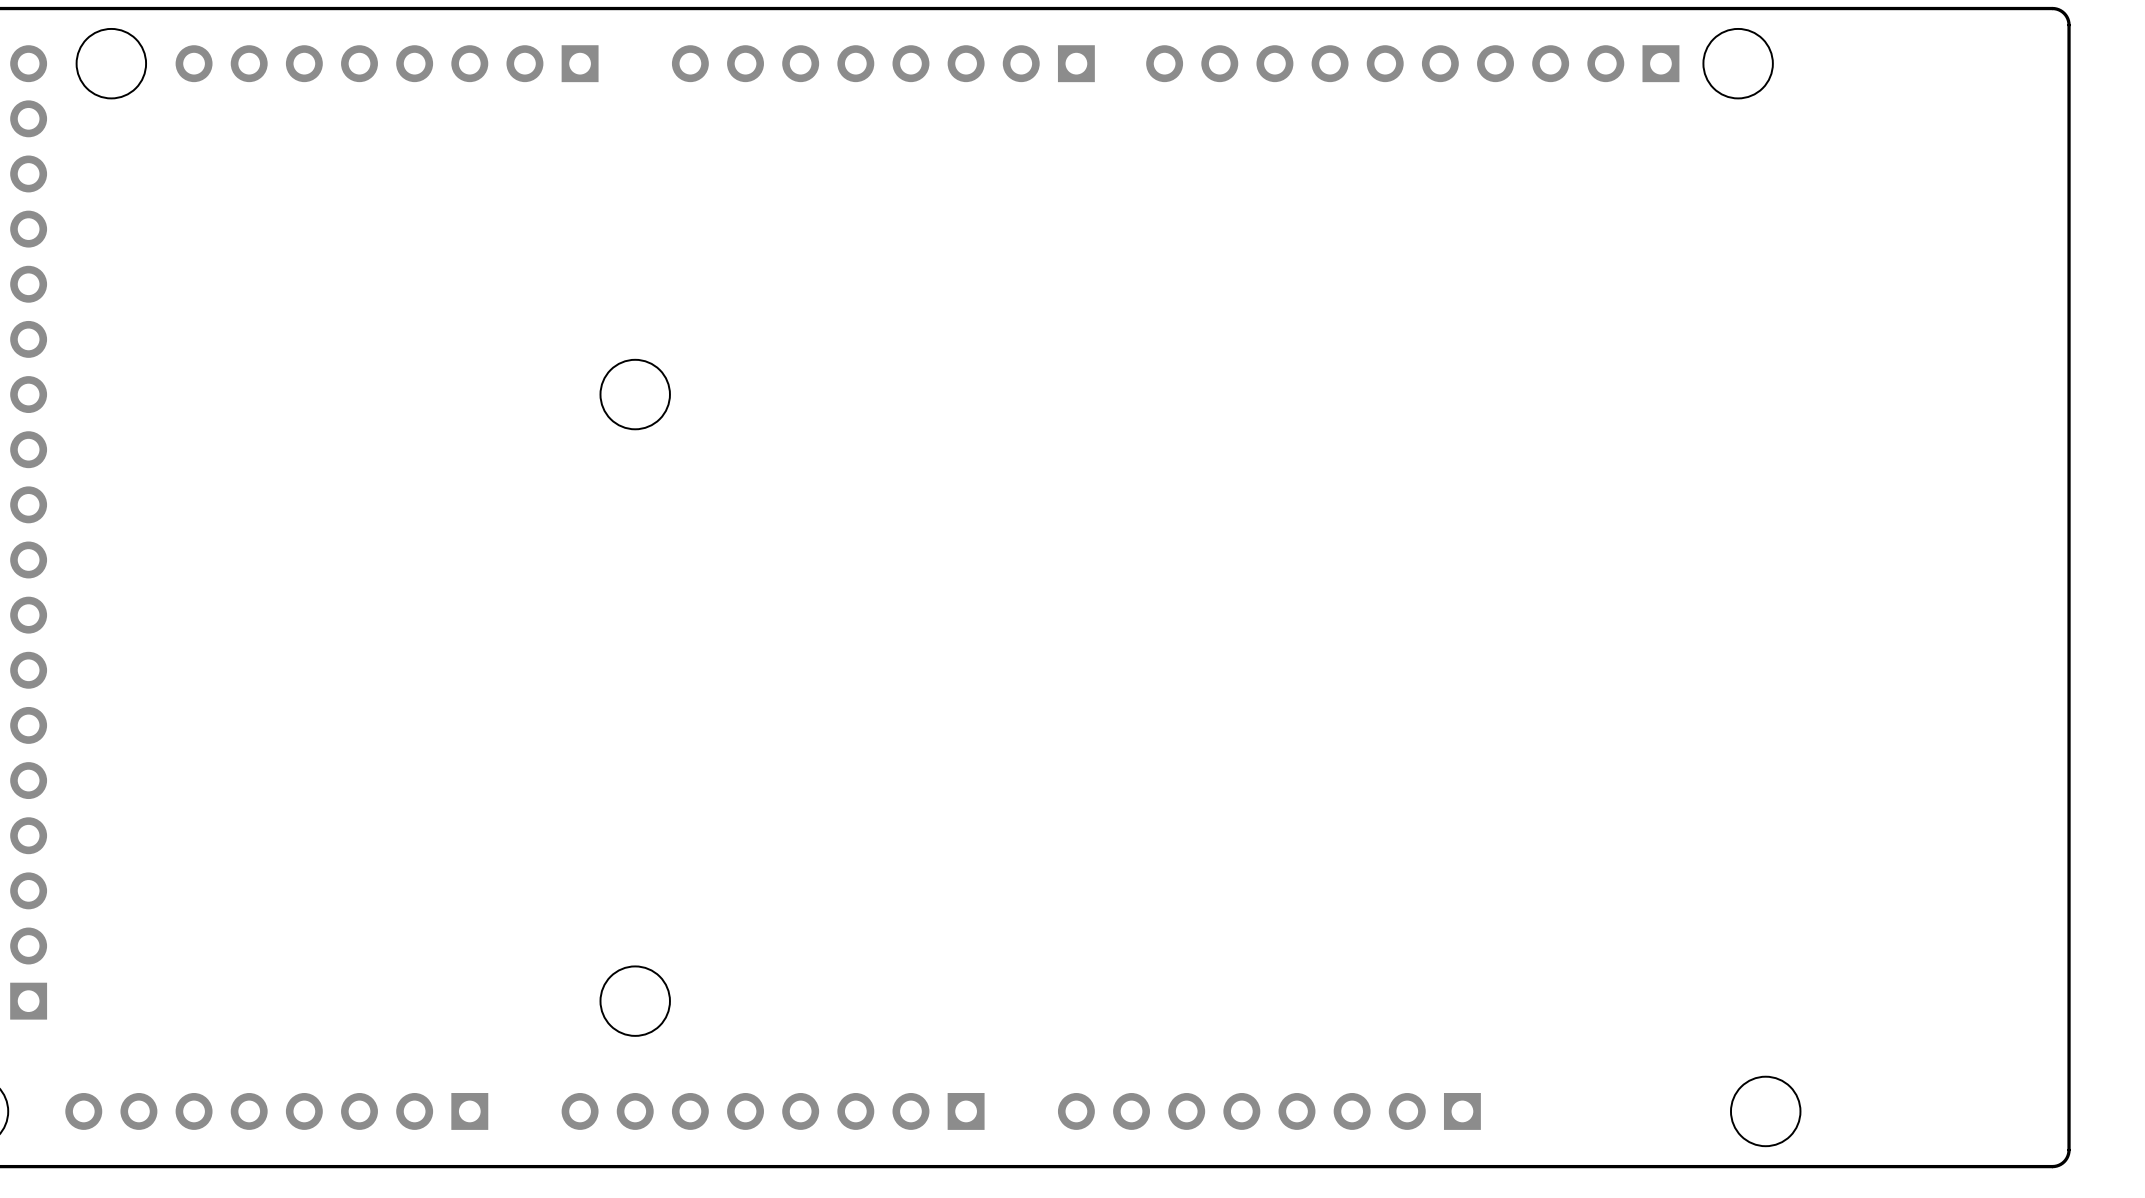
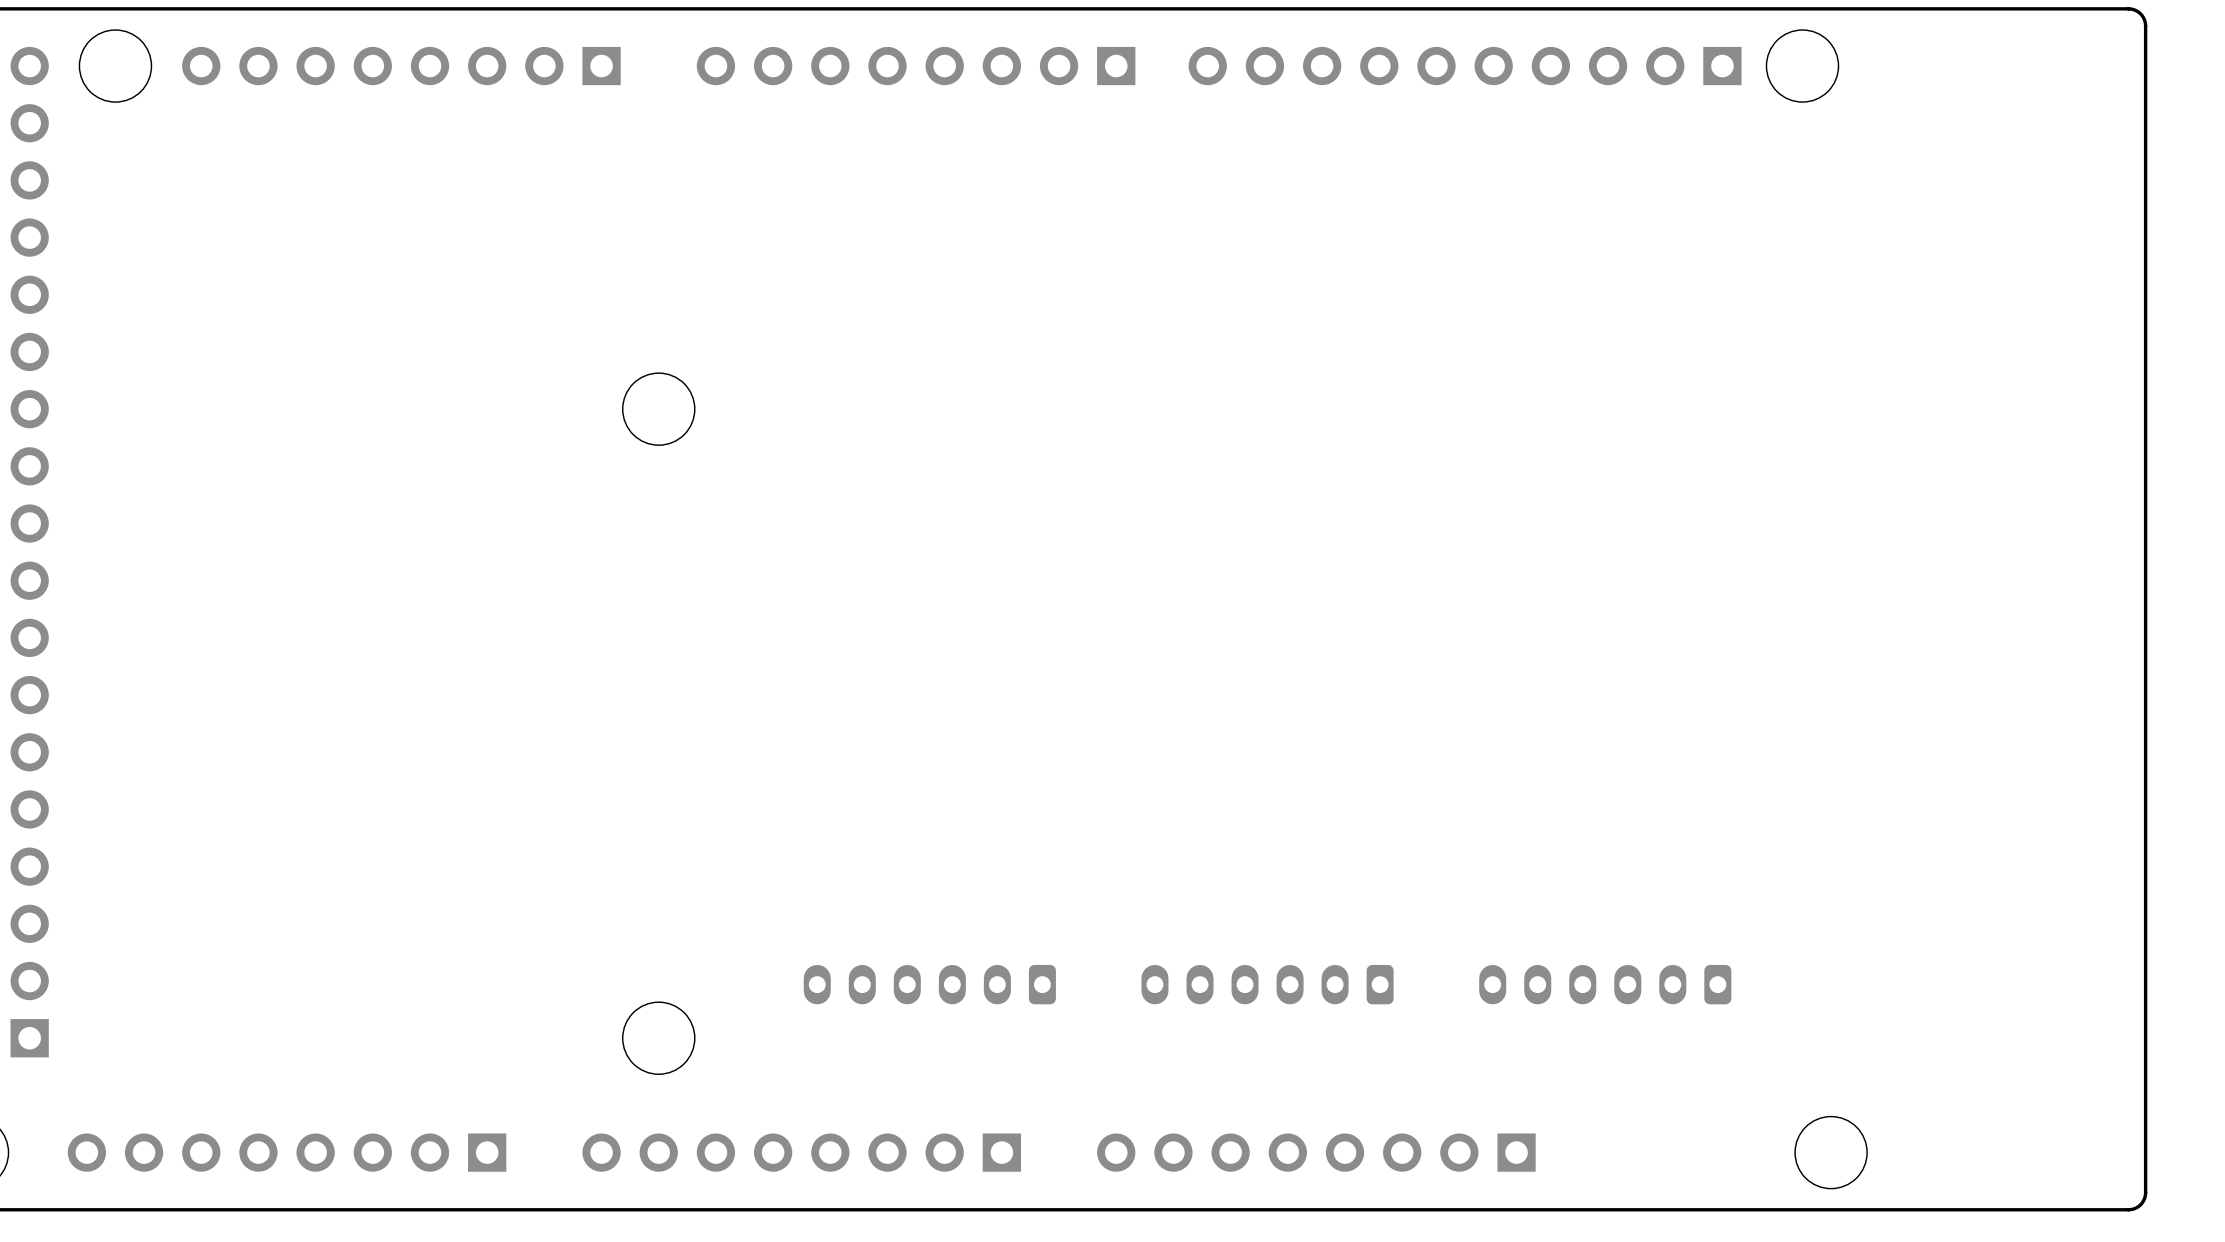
part: none -> (929, 984)
part: none -> (1267, 984)
part: none -> (1605, 984)

